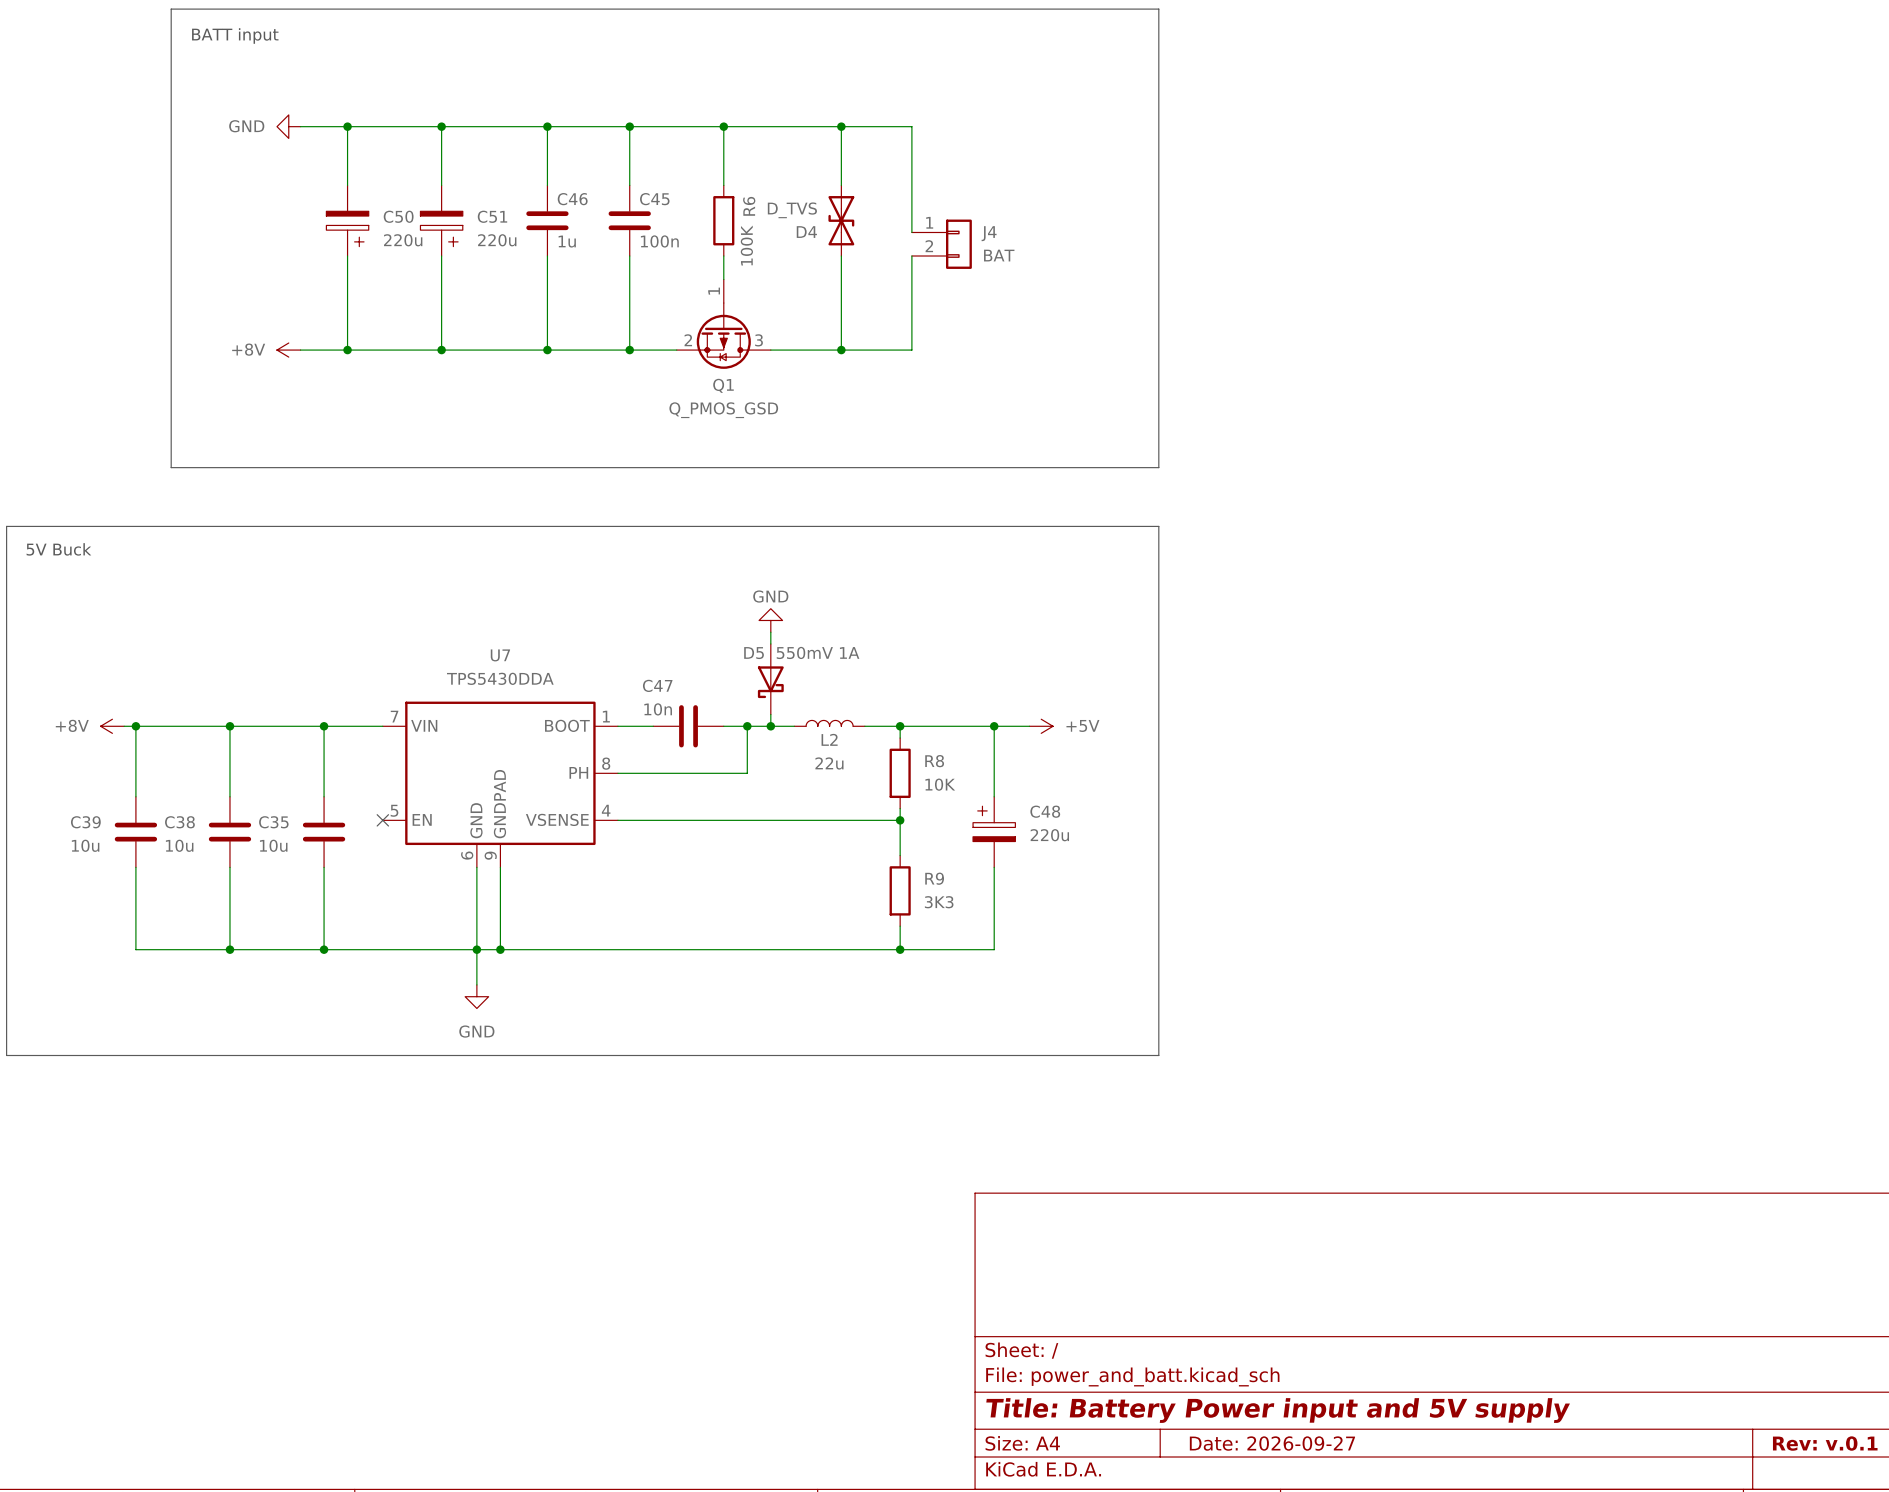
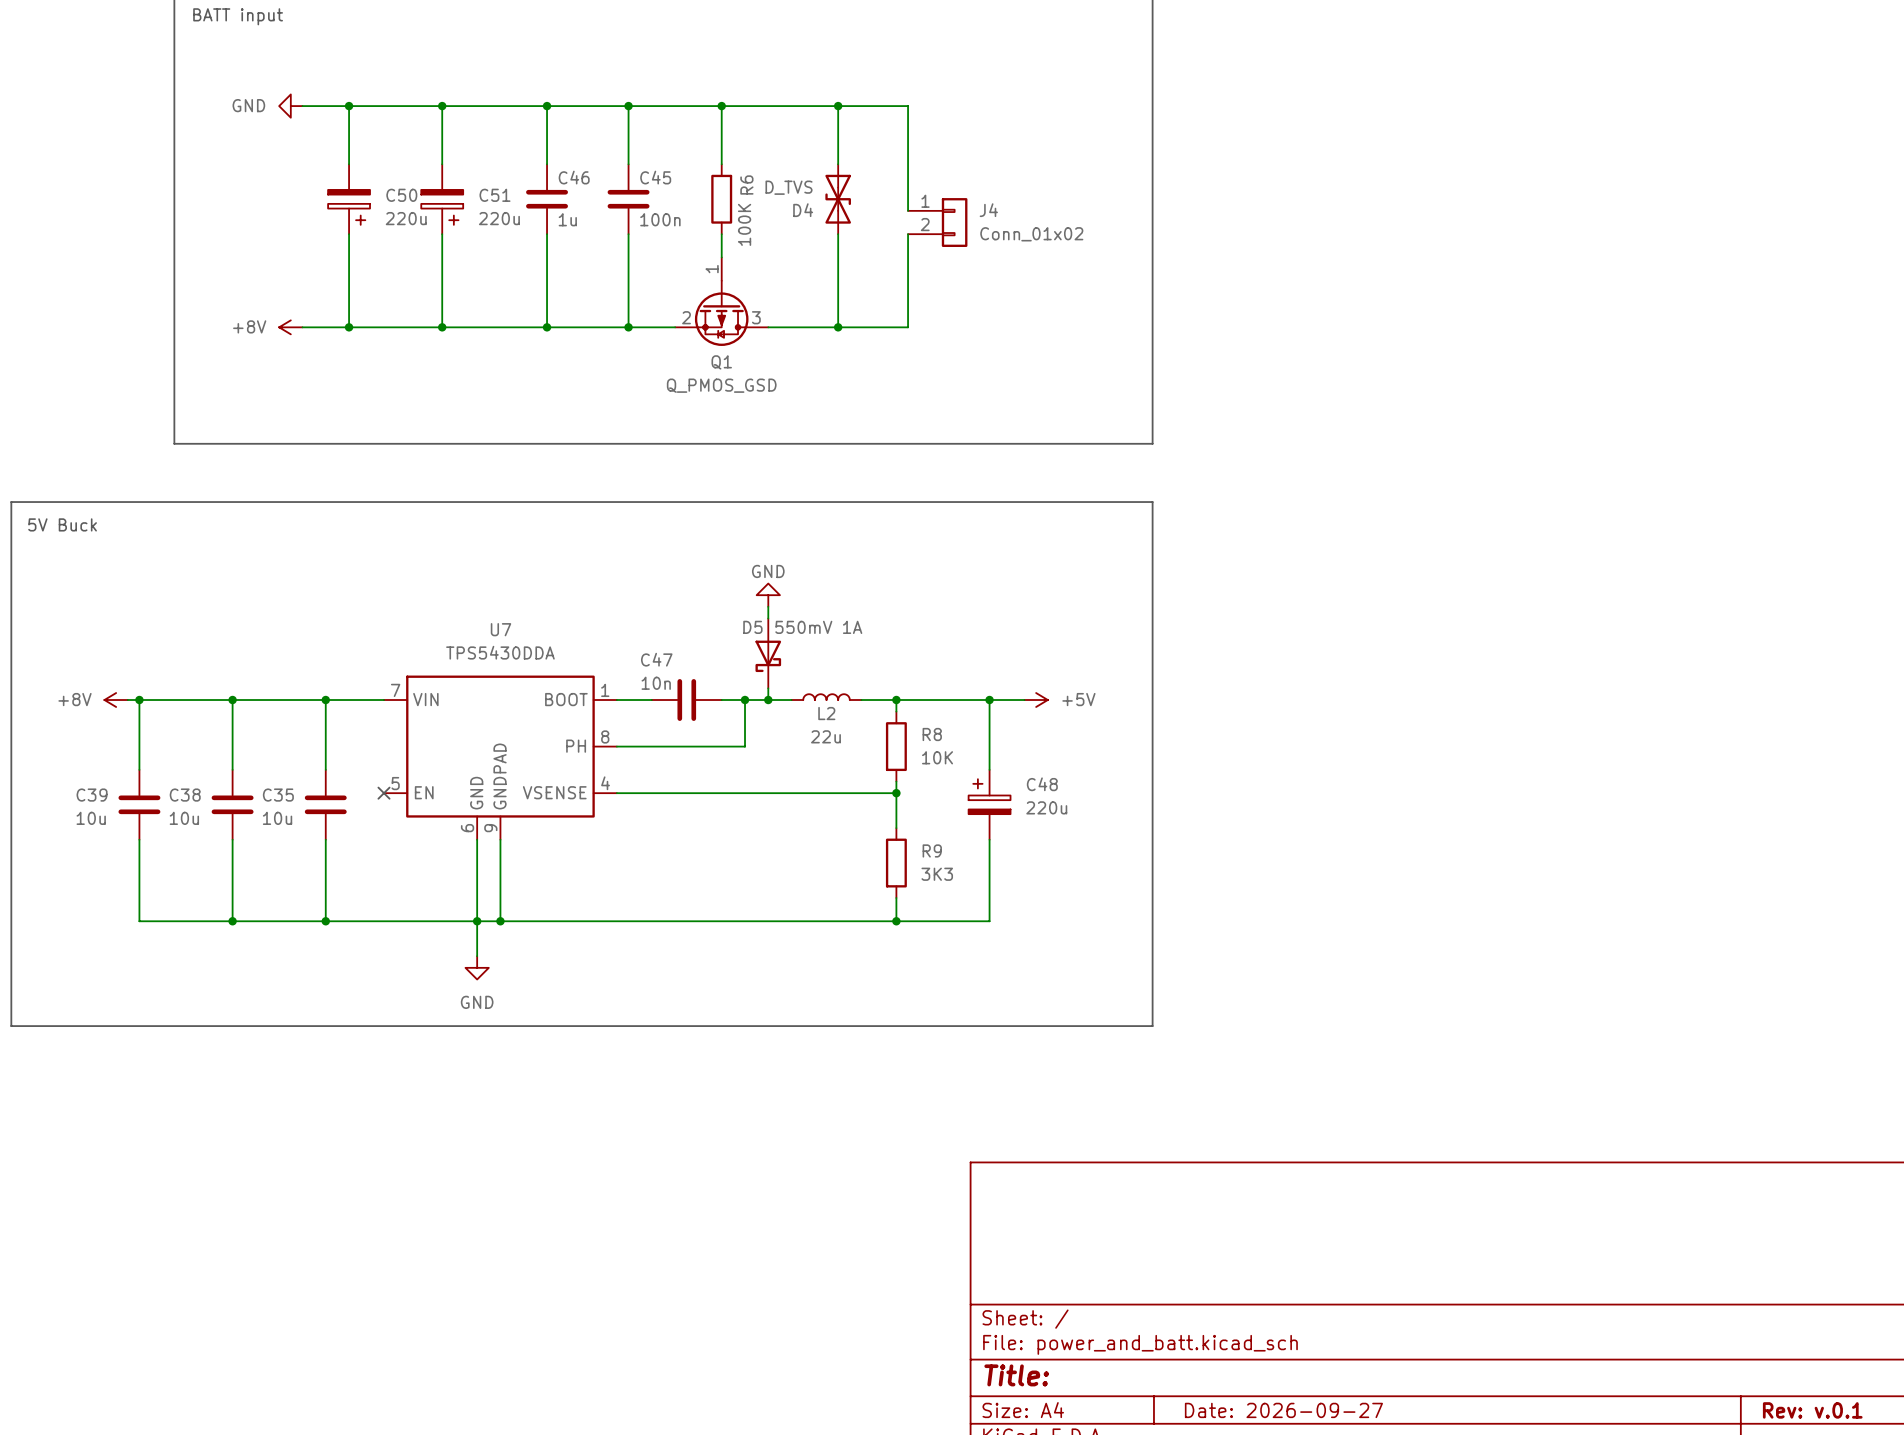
J4 value: BAT (999, 255) -> Conn_01x02 (1031, 234)
title block: Title: Battery Power input and 5V supply (1278, 1410) -> Title: (1016, 1375)

